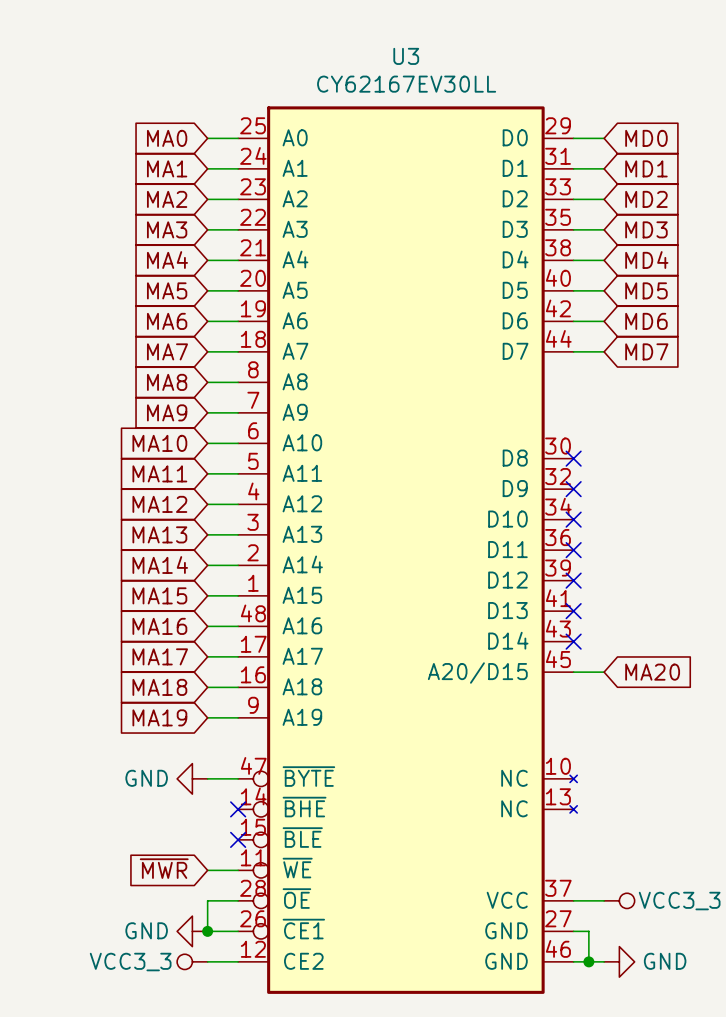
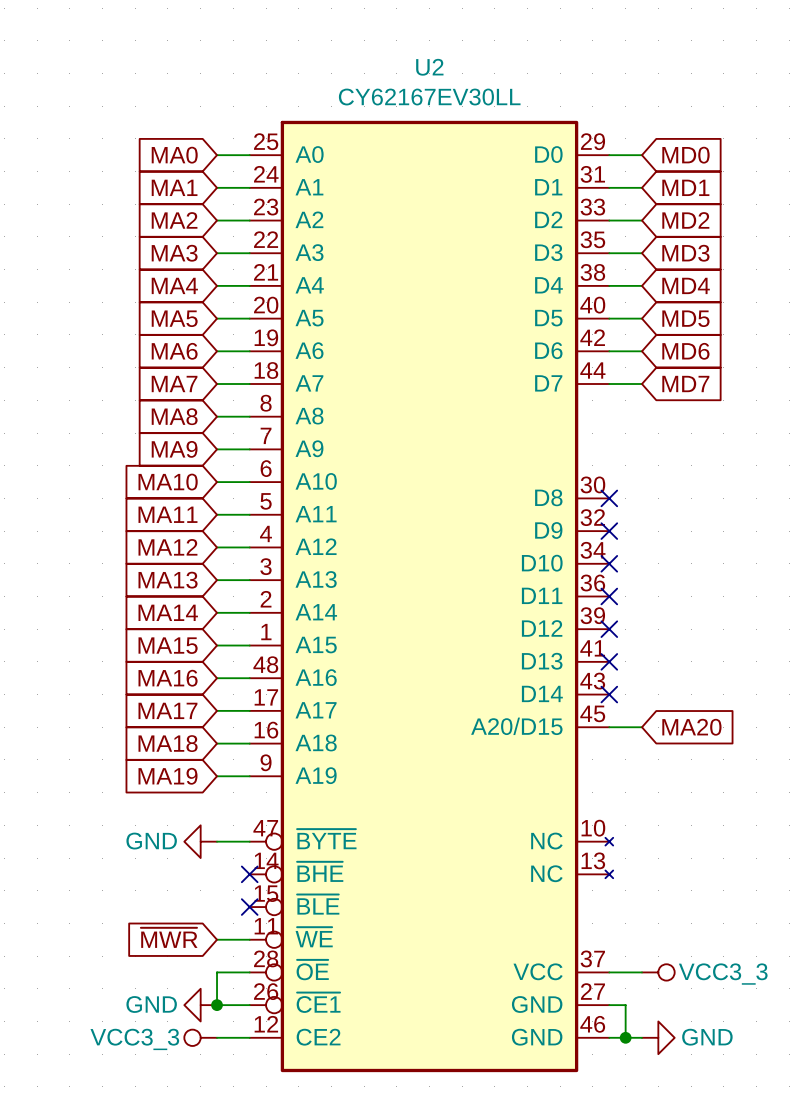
U3 name: U3 (406, 56) -> U2 (429, 67)

